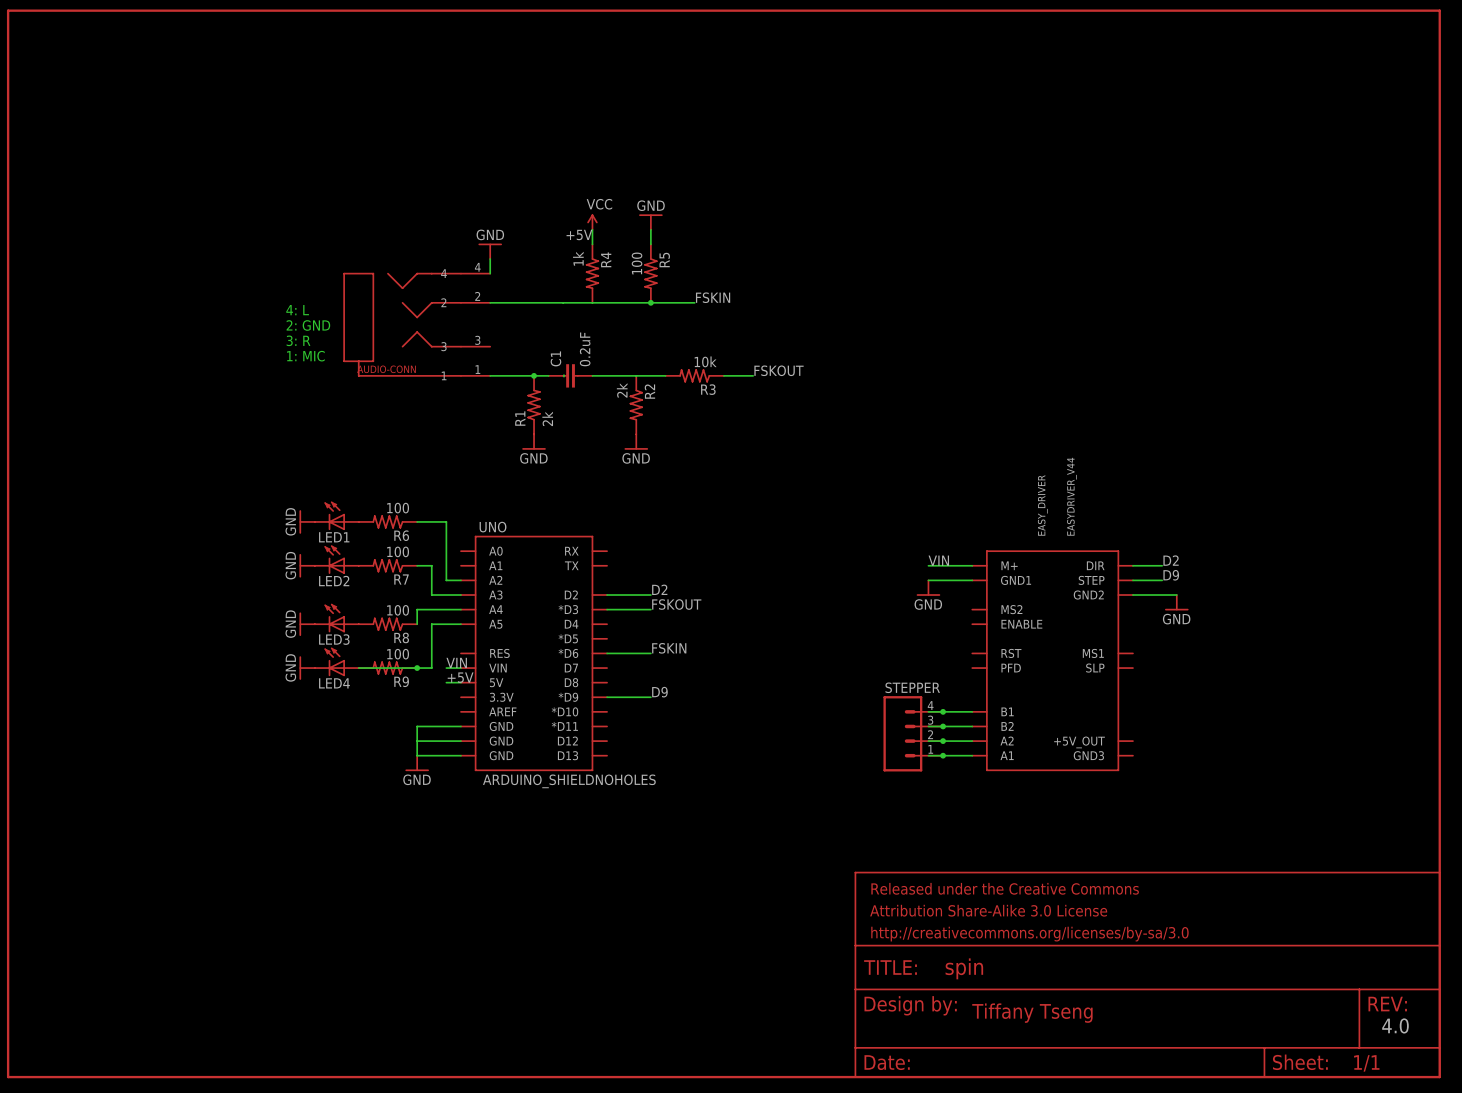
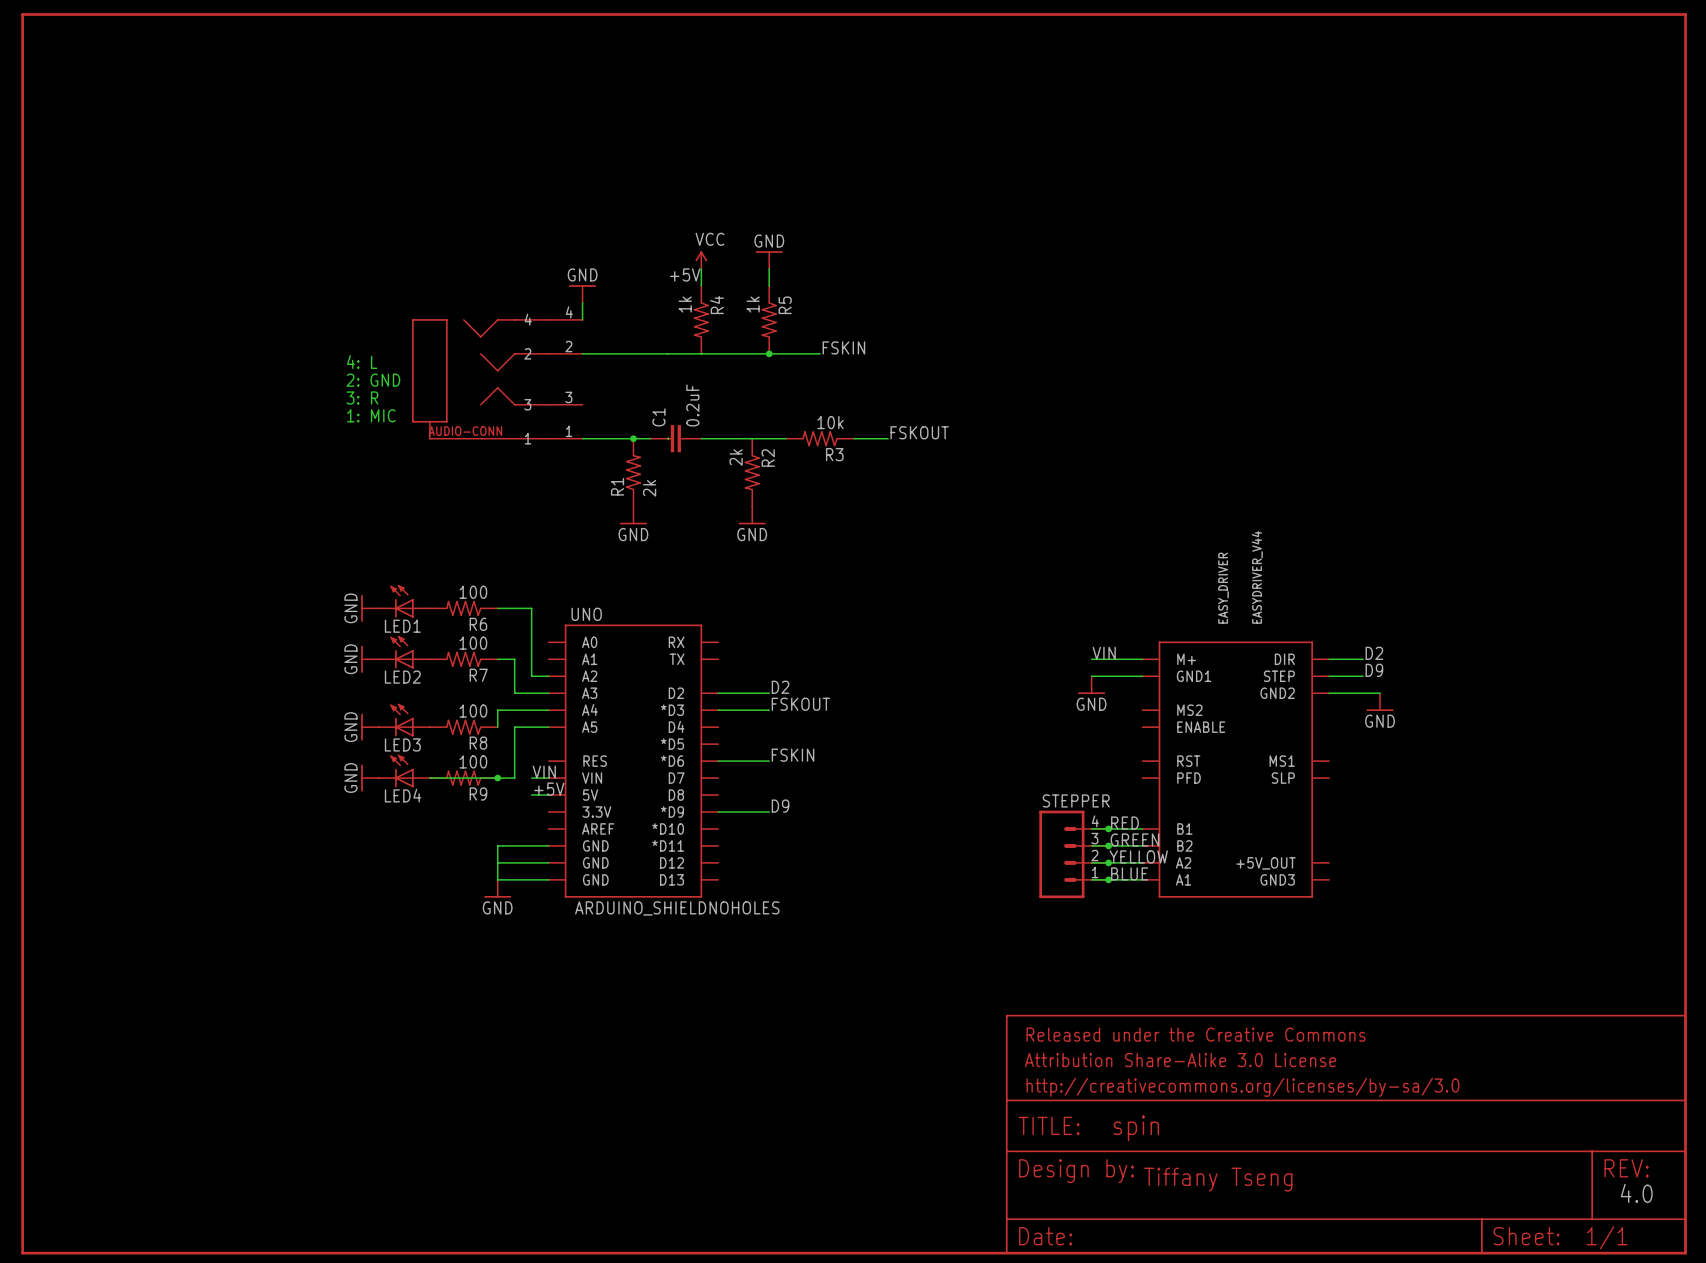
R5 value: 100 (637, 263) -> 1k (753, 304)
label: none -> RED (1124, 823)
label: none -> GREEN (1134, 840)
label: none -> YELLOW (1138, 856)
label: none -> BLUE (1129, 873)

